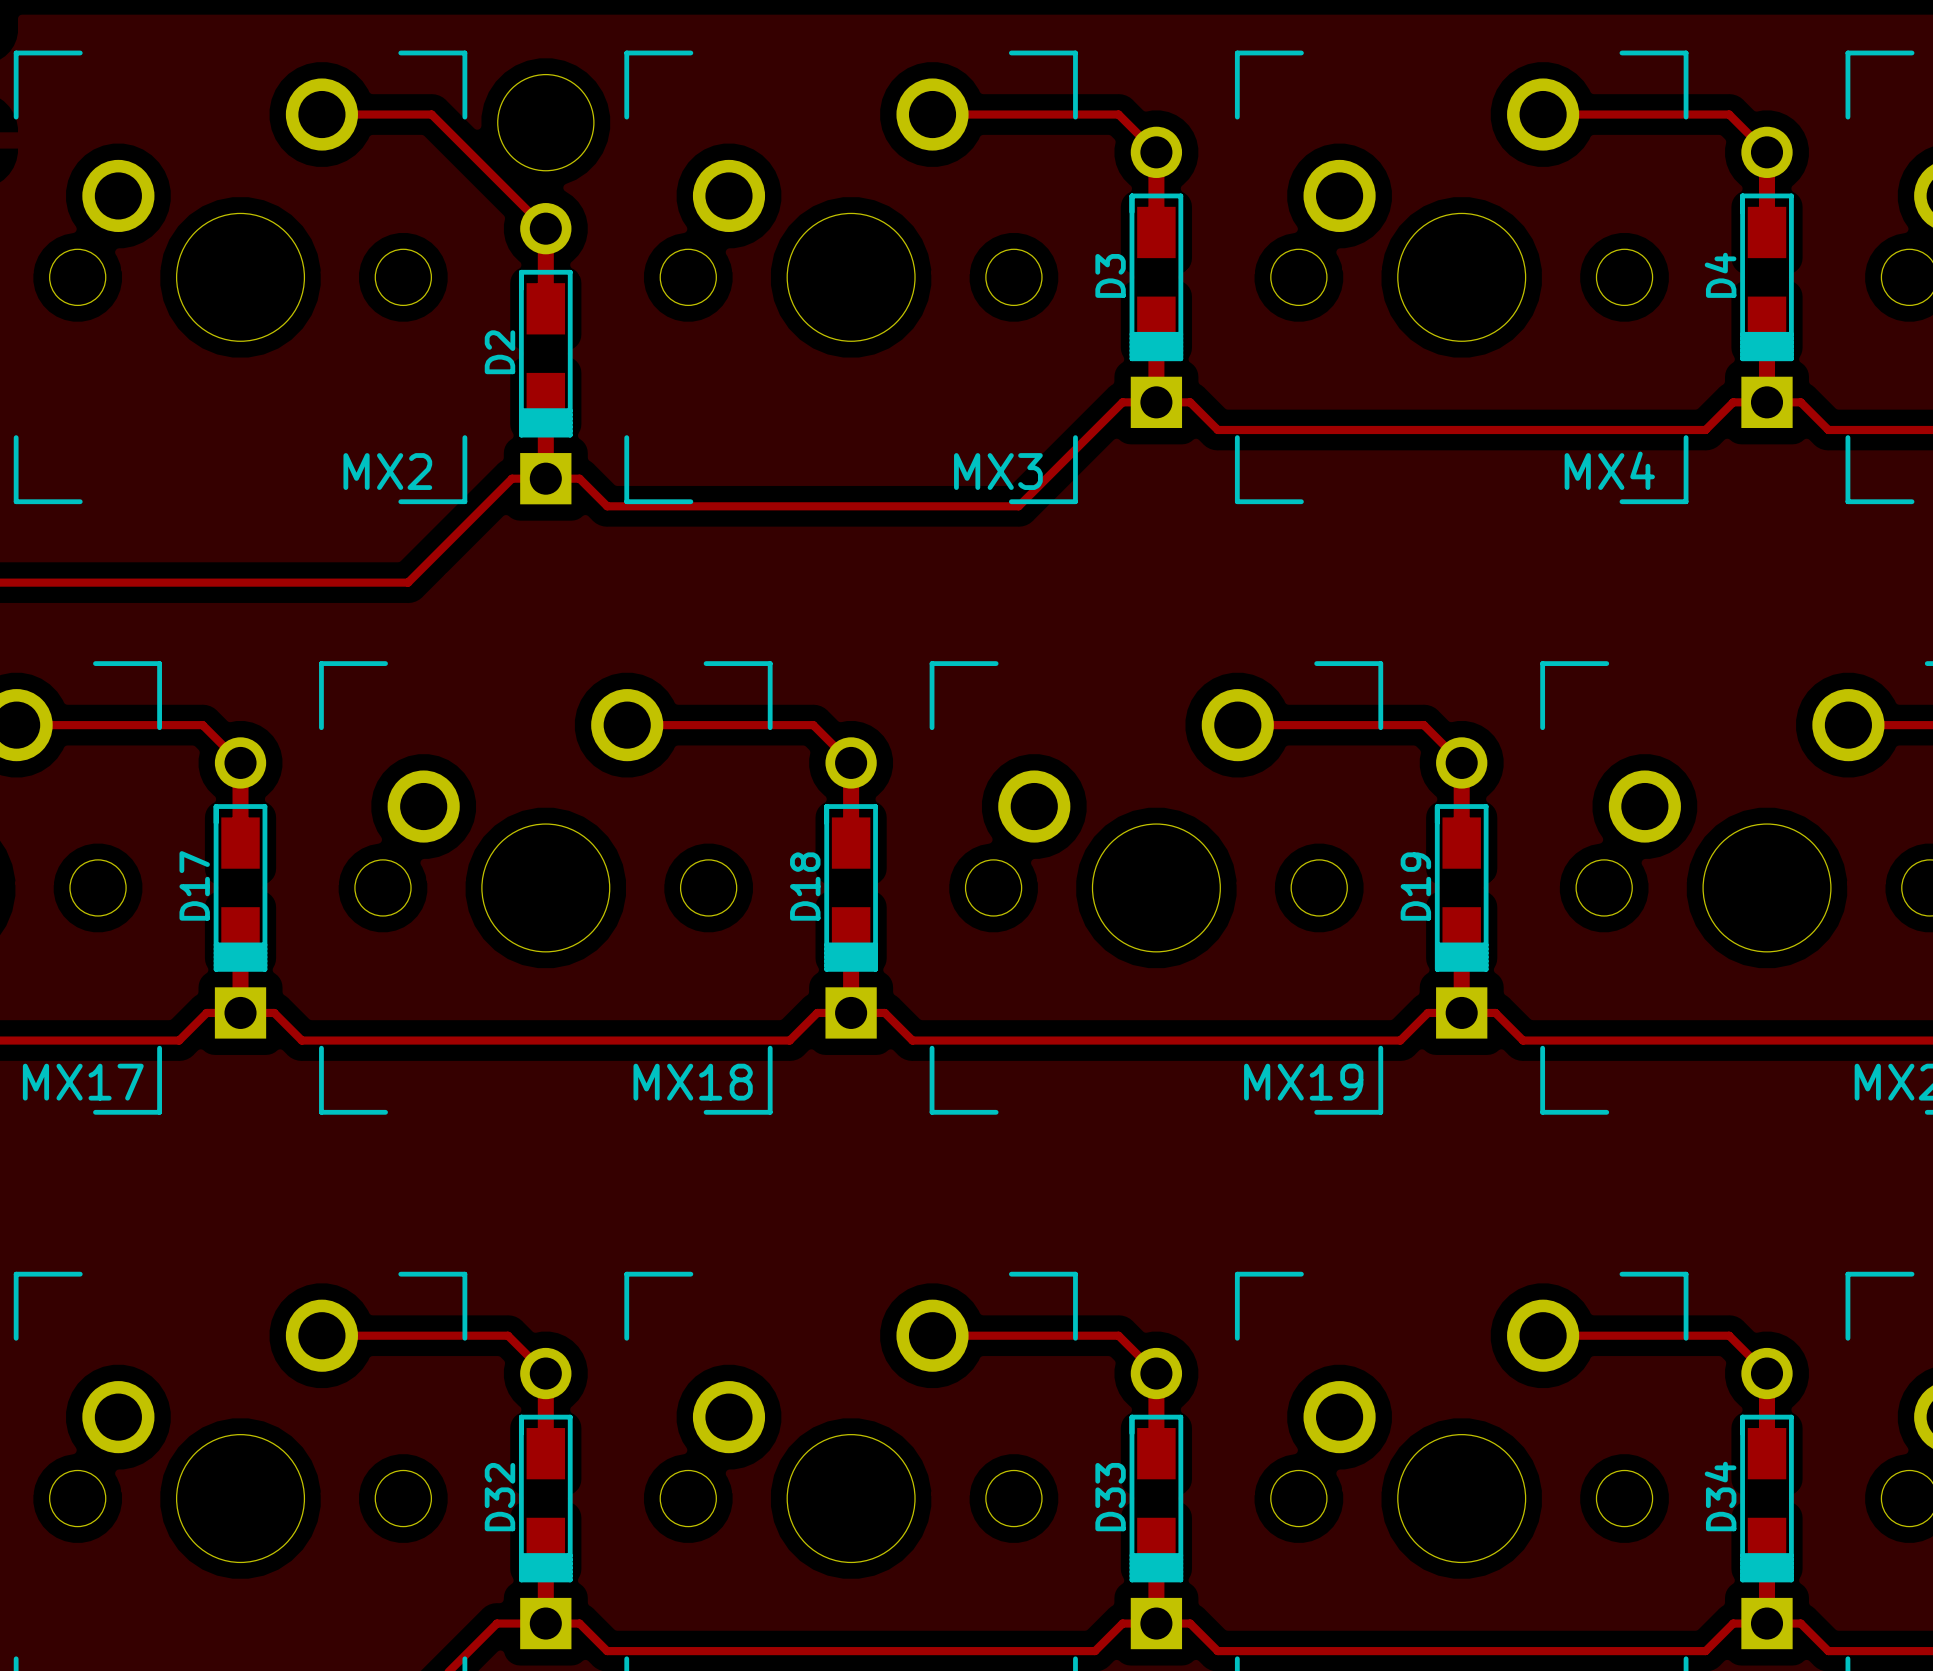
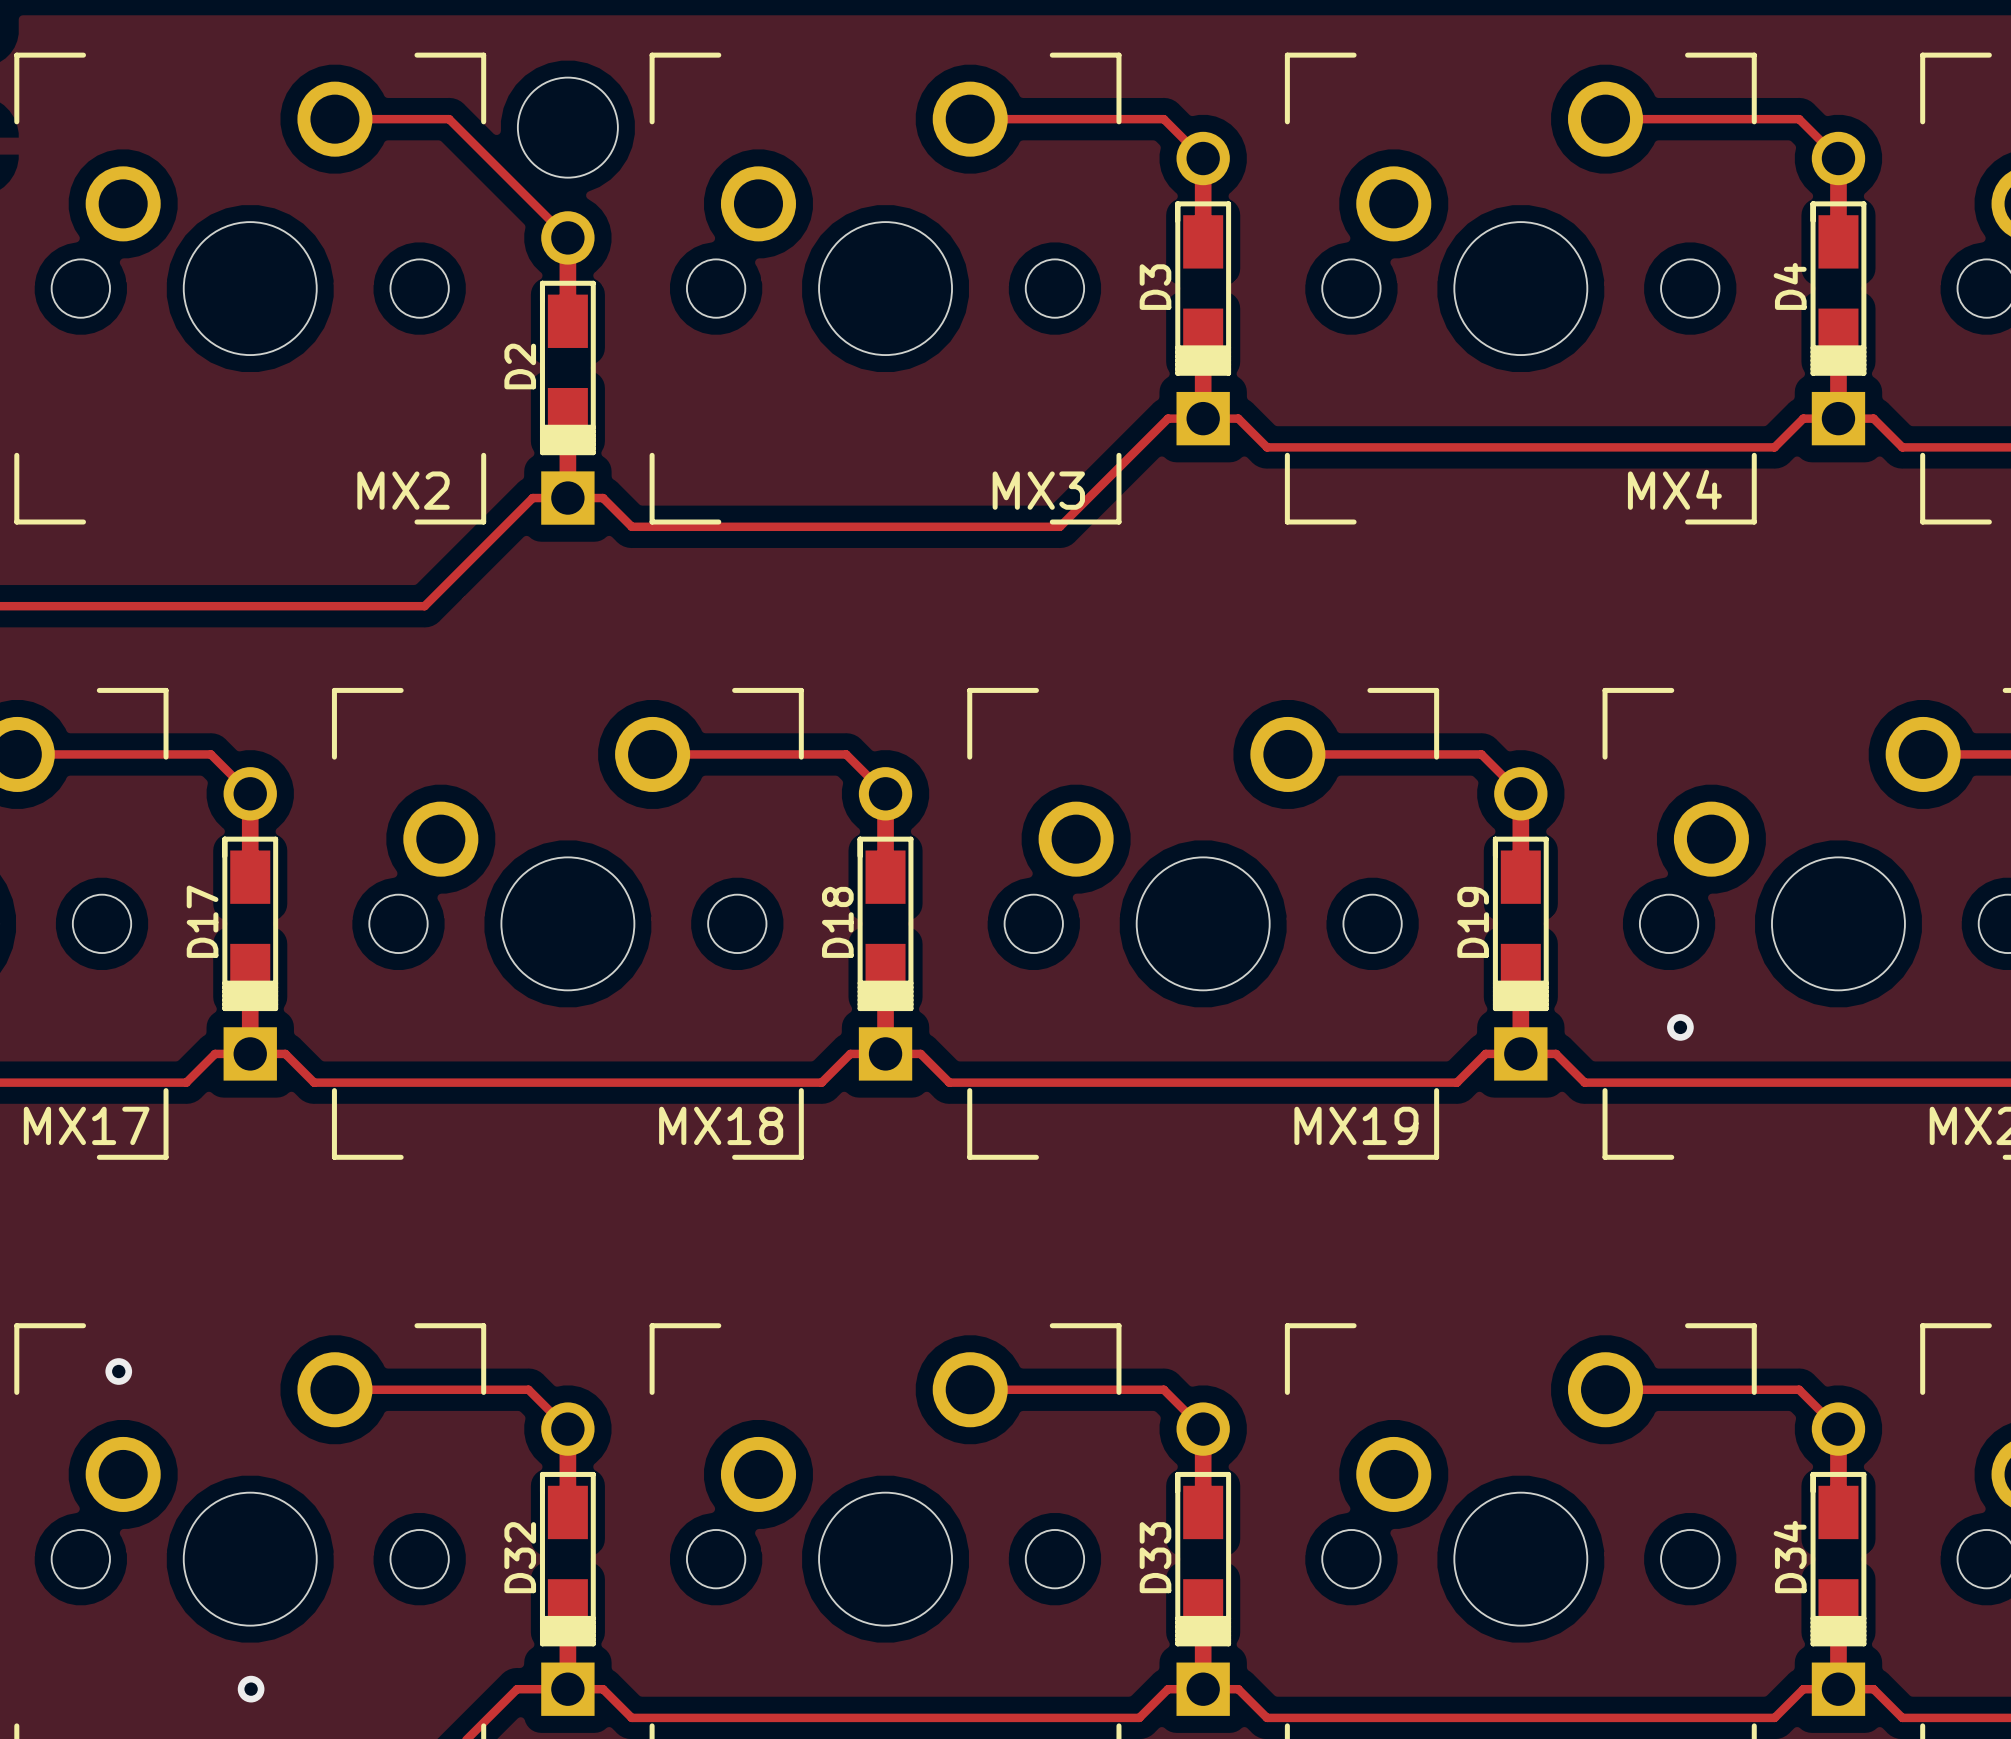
via: none -> (1680, 1027)
via: none -> (118, 1371)
via: none -> (251, 1689)

